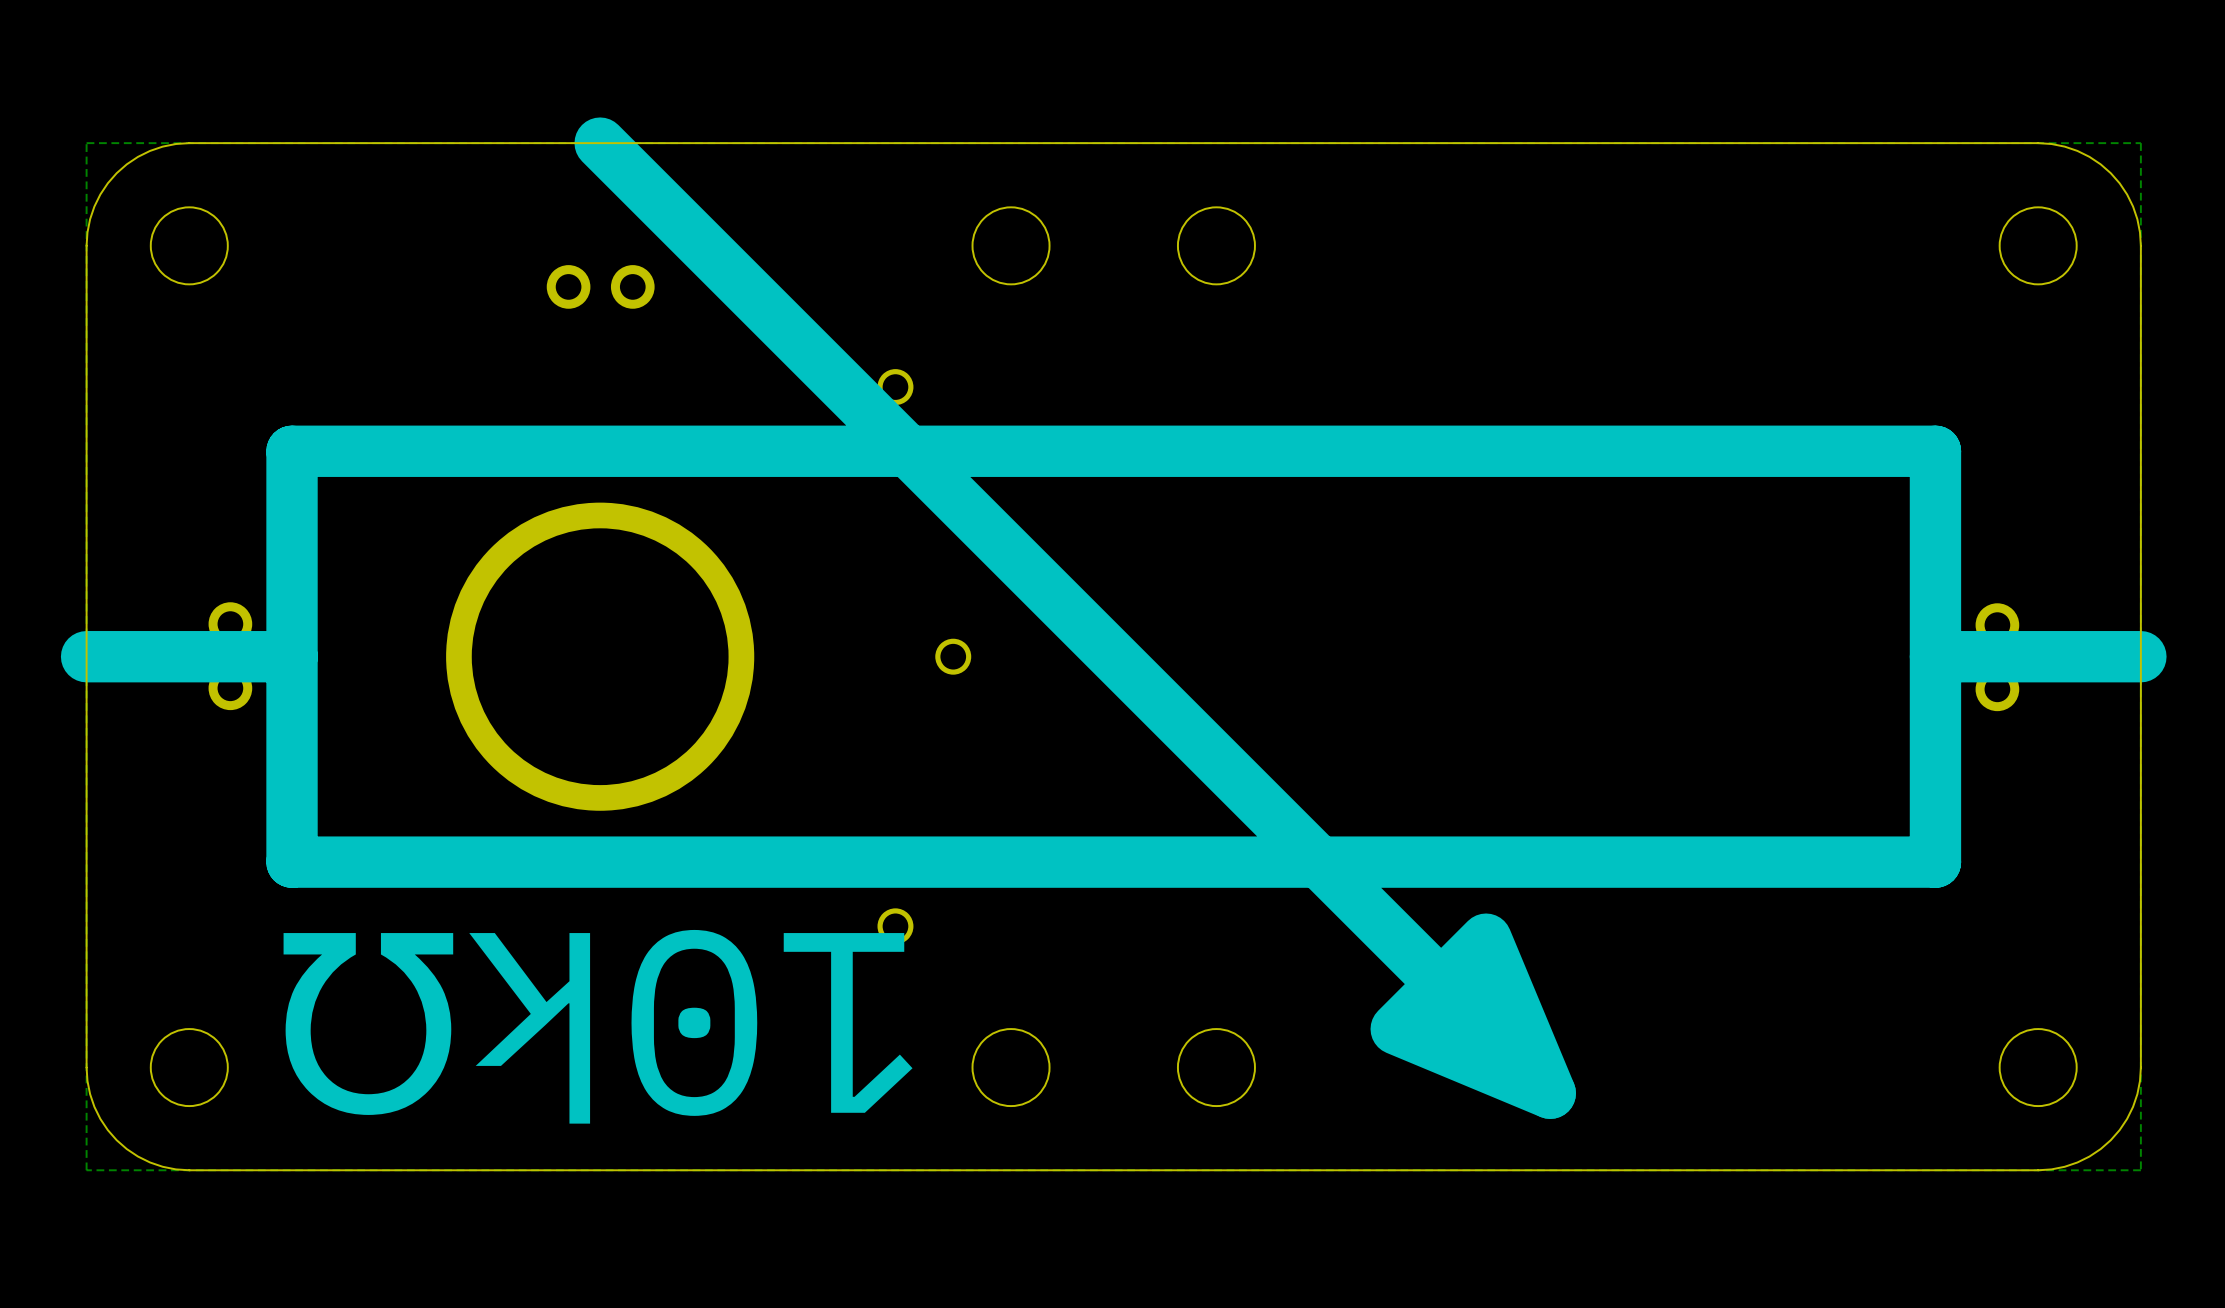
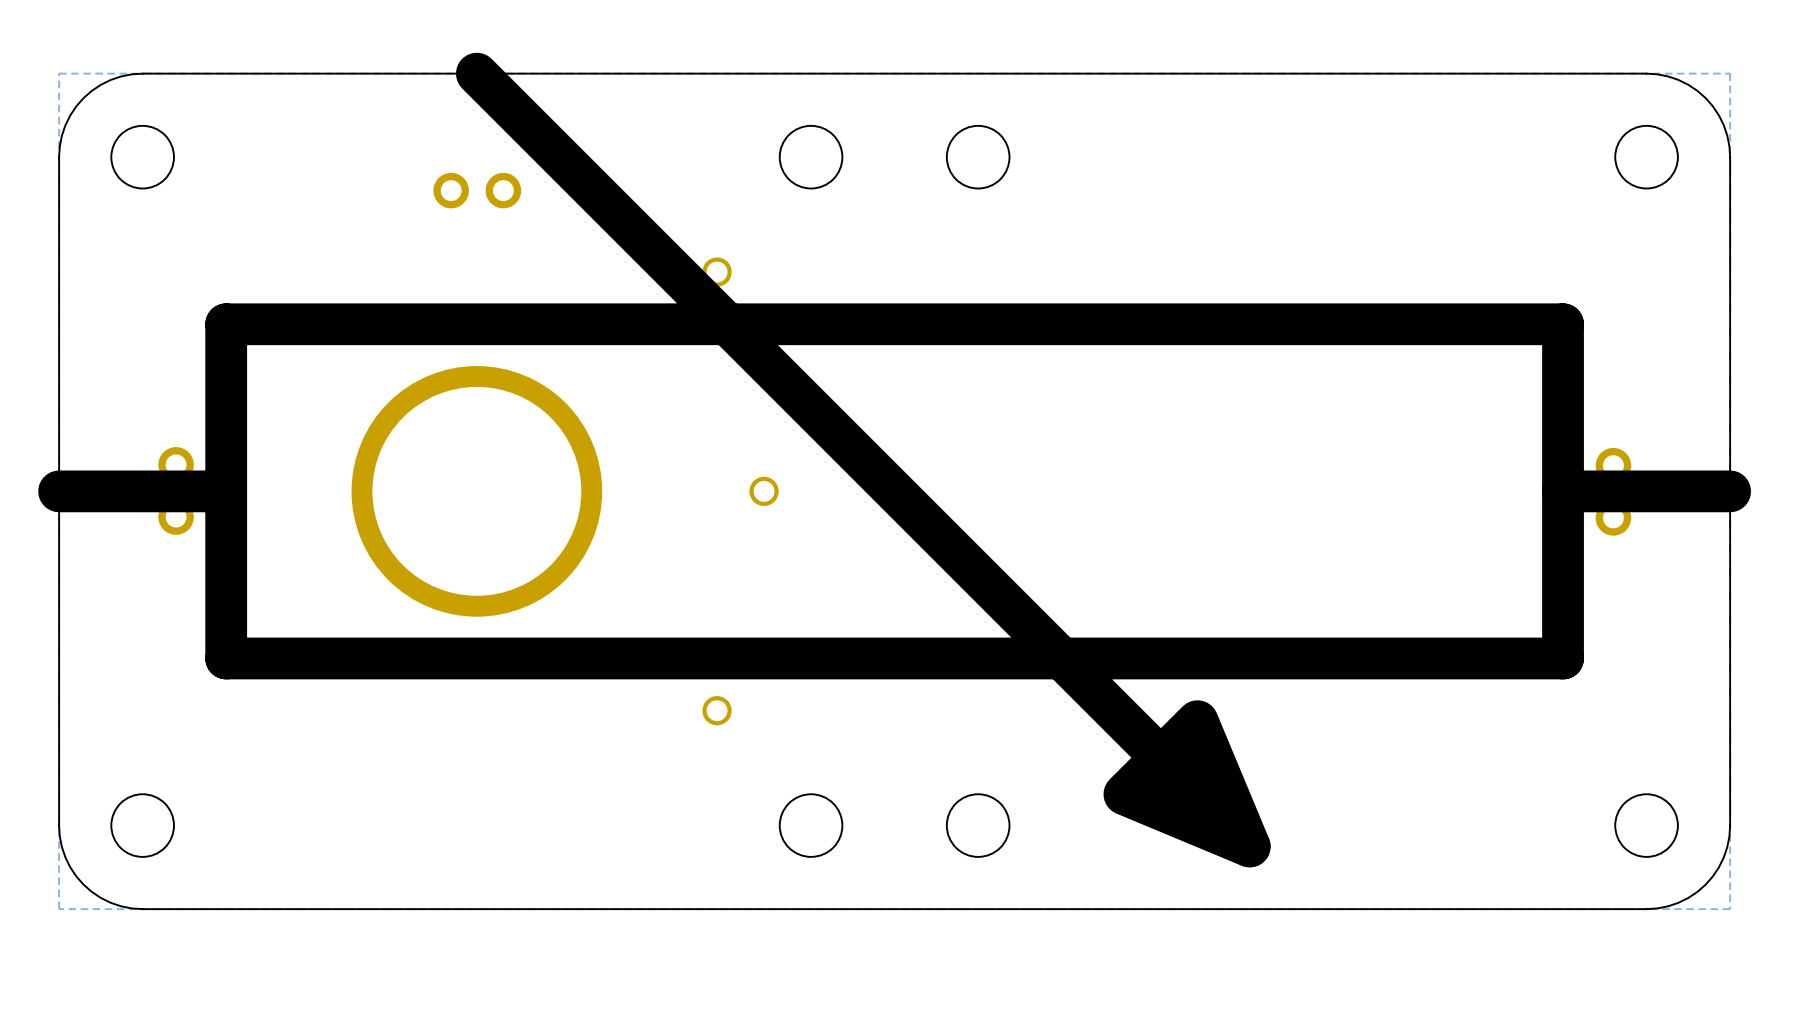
text: 10kΩ (598, 1026) -> none

